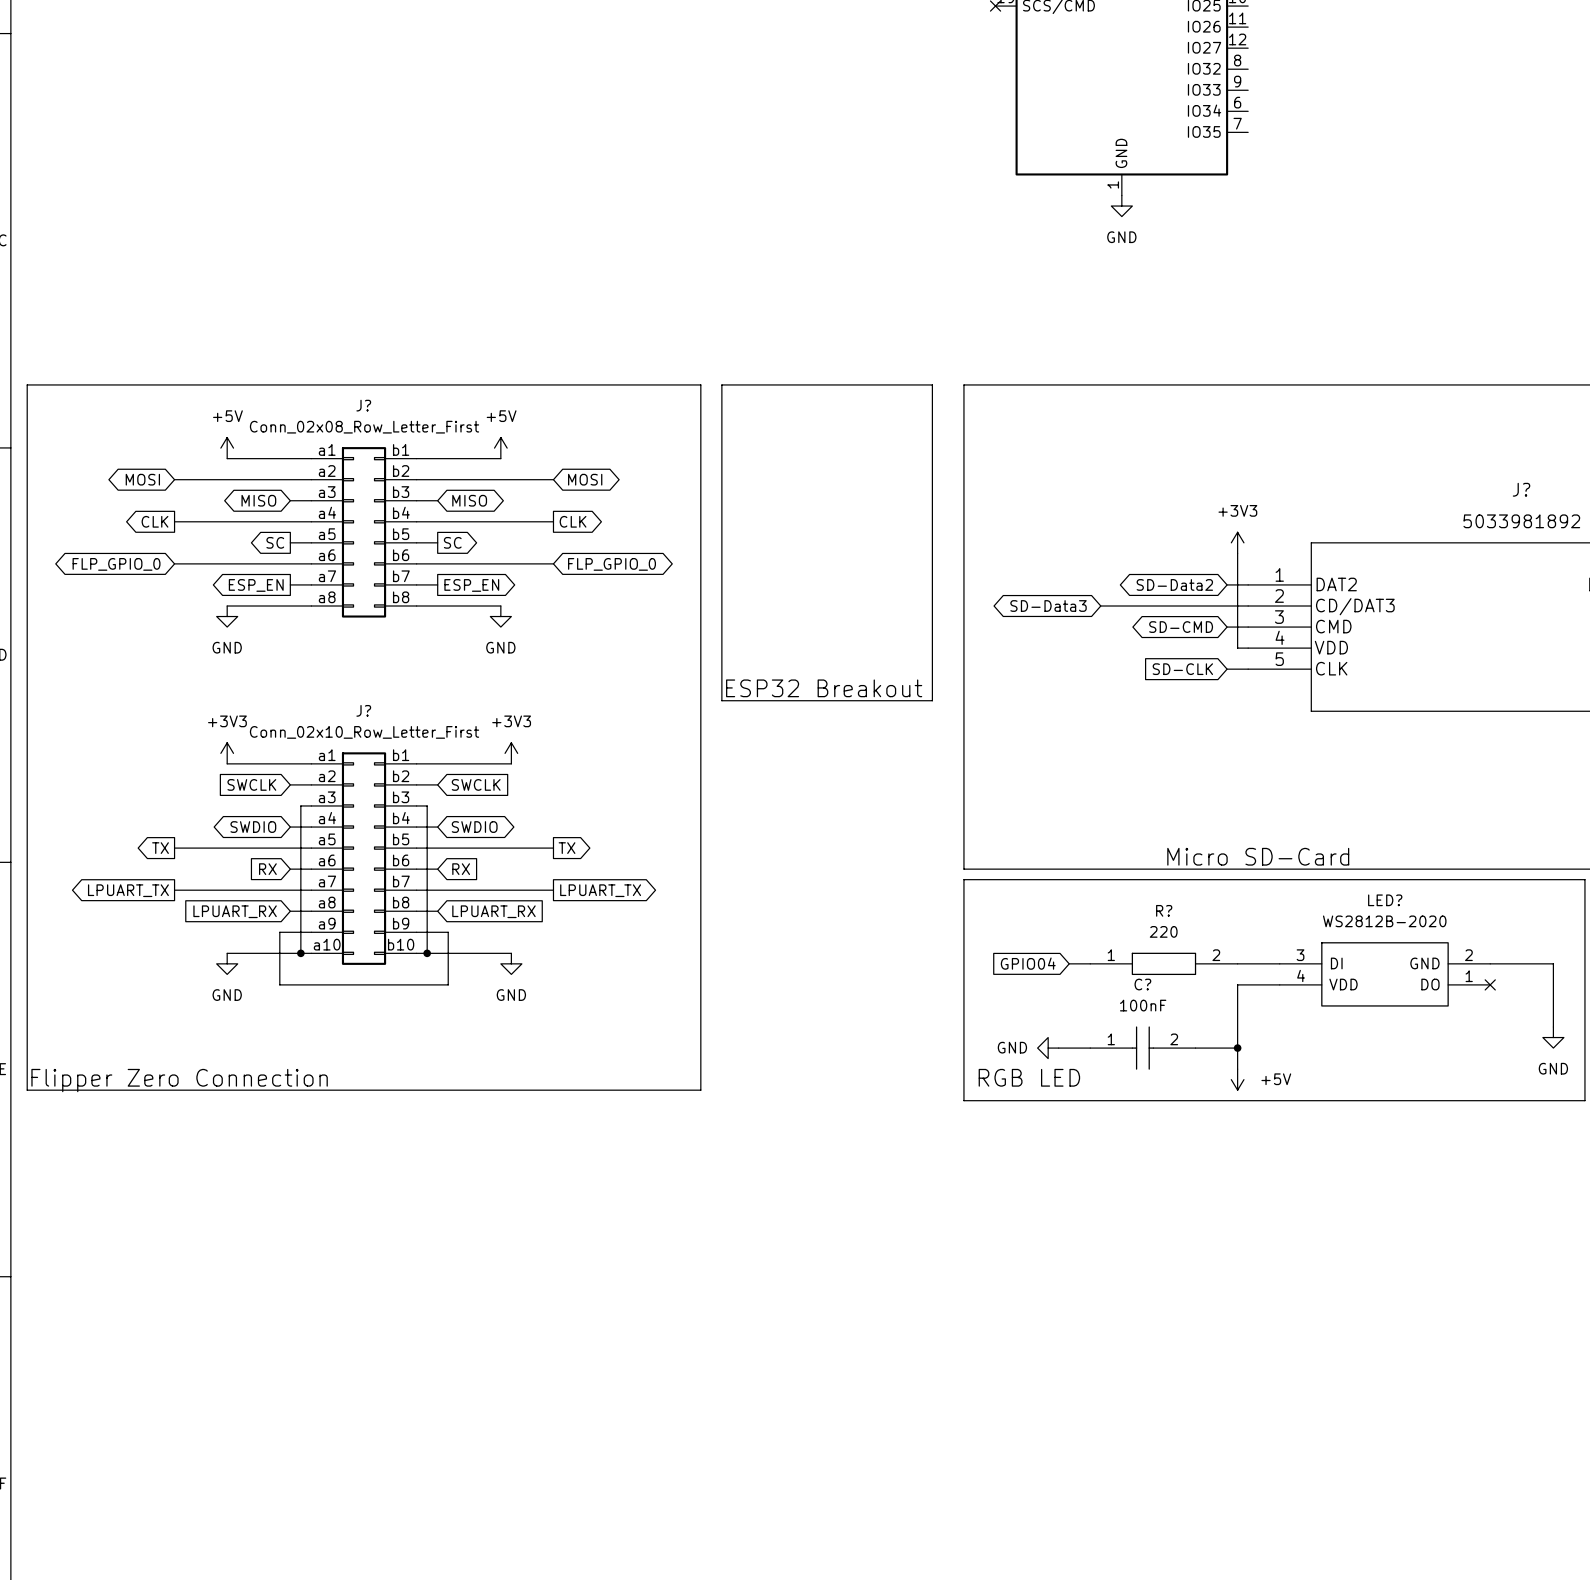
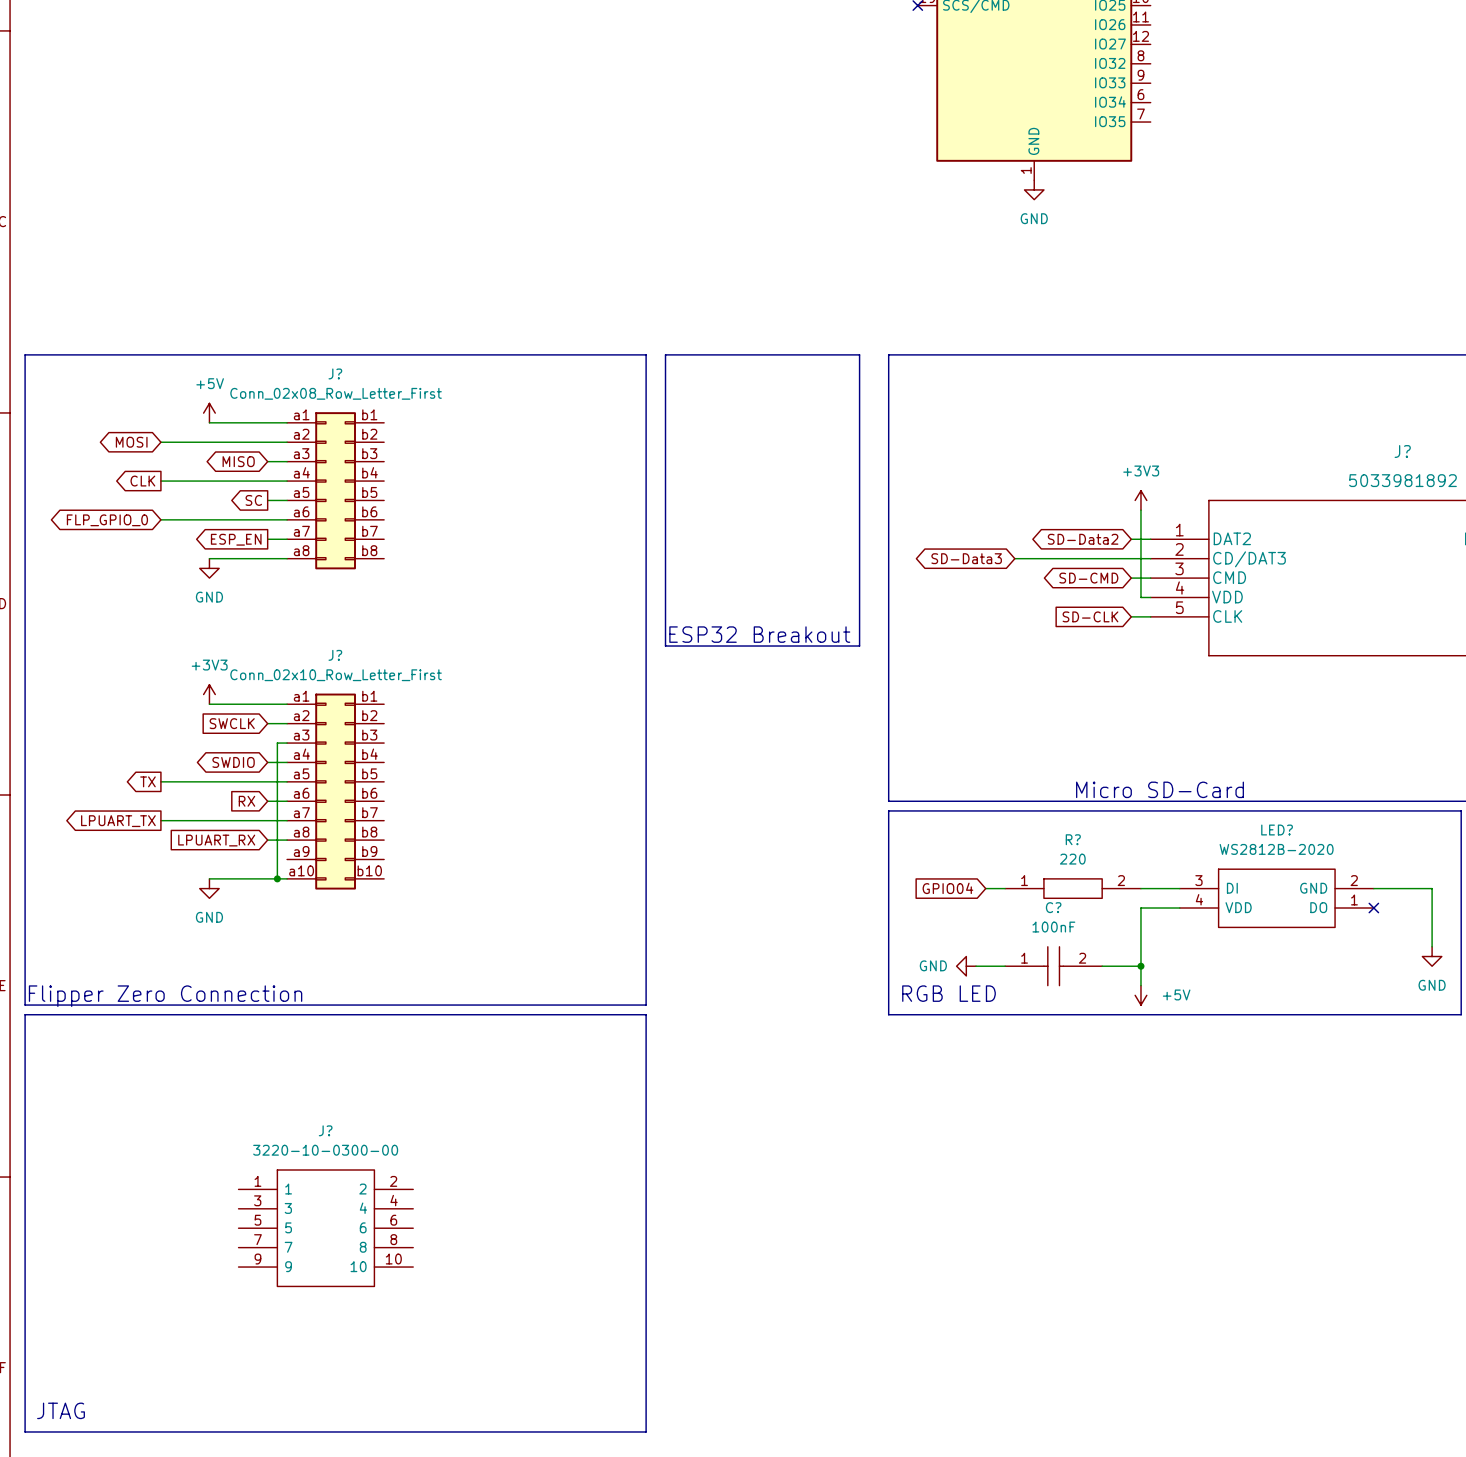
power symbol: +5V (500, 448) -> none
wire: (416, 458) (500, 458) -> none
wire: (416, 479) (553, 479) -> none
global label: MOSI (585, 479) -> none
wire: (416, 500) (437, 500) -> none
global label: MISO (469, 500) -> none
wire: (416, 521) (553, 521) -> none
global label: CLK (573, 521) -> none
wire: (416, 542) (437, 542) -> none
global label: SC (452, 542) -> none
wire: (416, 563) (553, 563) -> none
global label: FLP_GPIO_0 (612, 564) -> none
wire: (416, 584) (437, 584) -> none
global label: ESP_EN (471, 585) -> none
wire: (416, 606) (500, 606) -> none
power symbol: GND (500, 616) -> none
power symbol: +3V3 (511, 753) -> none
wire: (416, 763) (511, 763) -> none
wire: (416, 784) (437, 784) -> none
global label: SWCLK (476, 784) -> none
wire: (416, 805) (427, 805) (427, 953) -> none
wire: (416, 827) (437, 827) -> none
global label: SWDIO (474, 827) -> none
wire: (416, 848) (553, 848) -> none
global label: TX (567, 848) -> none
wire: (416, 869) (437, 869) -> none
global label: RX (461, 869) -> none
wire: (416, 890) (553, 890) -> none
global label: LPUART_TX (600, 890) -> none
wire: (416, 911) (437, 911) -> none
global label: LPUART_RX (493, 911) -> none
wire: (311, 932) (279, 932) (279, 984) (448, 984) (448, 932) (416, 932) -> none
wire: (416, 953) (511, 953) -> none
junction: (427, 953) -> none
power symbol: GND (511, 963) -> none
line: none -> (25, 1014) (25, 1431) (646, 1431) (646, 1014) (25, 1014)
J?: none -> 3220-10-0300-00 (325, 1228)
text: none -> JTAG (61, 1410)

